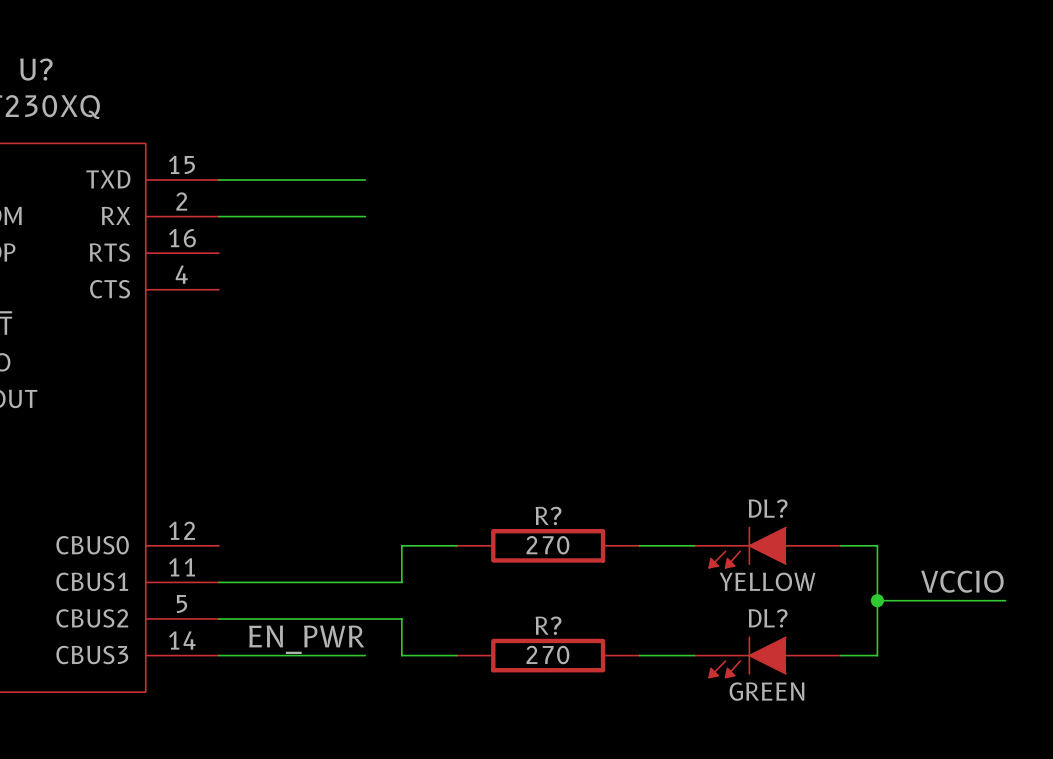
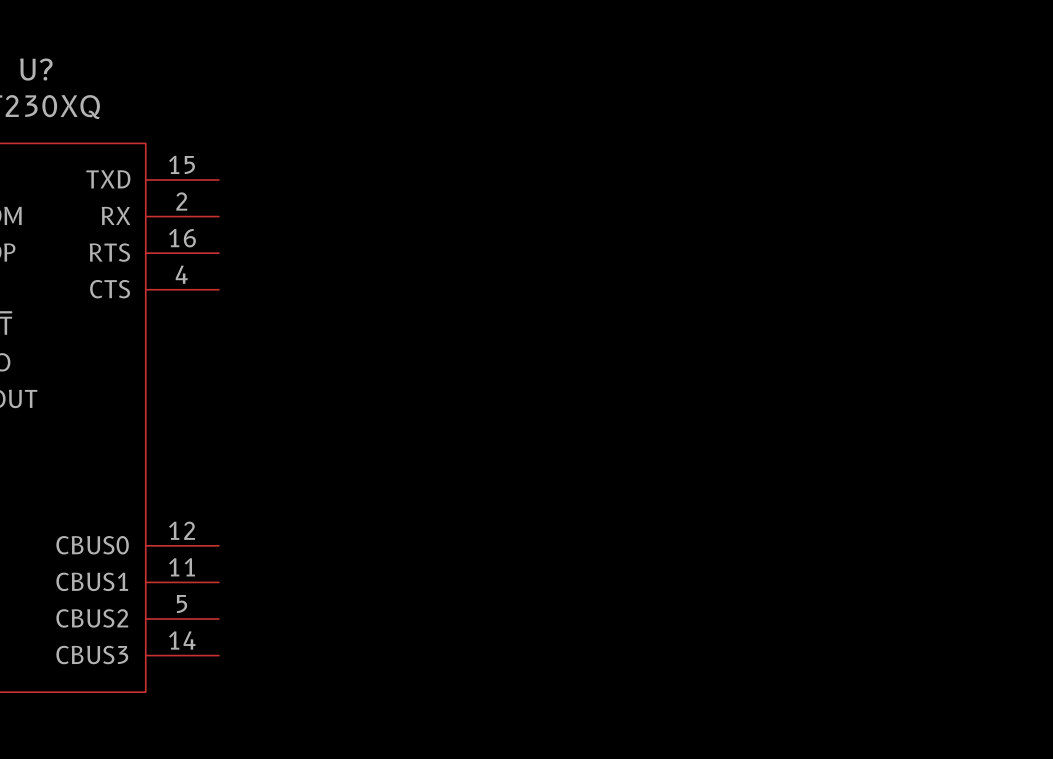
wire: (218, 179) (365, 179) -> none
wire: (218, 216) (365, 216) -> none
wire: (456, 545) (401, 545) (401, 582) (218, 582) -> none
R?: 270 (548, 545) -> none
wire: (639, 545) (694, 545) -> none
wire: (840, 545) (877, 545) (877, 655) (840, 655) -> none
DL?: YELLOW (767, 547) -> none
label: VCCIO (962, 581) -> none
wire: (877, 600) (1005, 600) -> none
junction: (877, 600) -> none
wire: (218, 618) (401, 618) (401, 655) (456, 655) -> none
label: EN_PWR (306, 639) -> none
wire: (218, 655) (365, 655) -> none
R?: 270 (548, 655) -> none
wire: (639, 655) (694, 655) -> none
DL?: GREEN (767, 657) -> none

